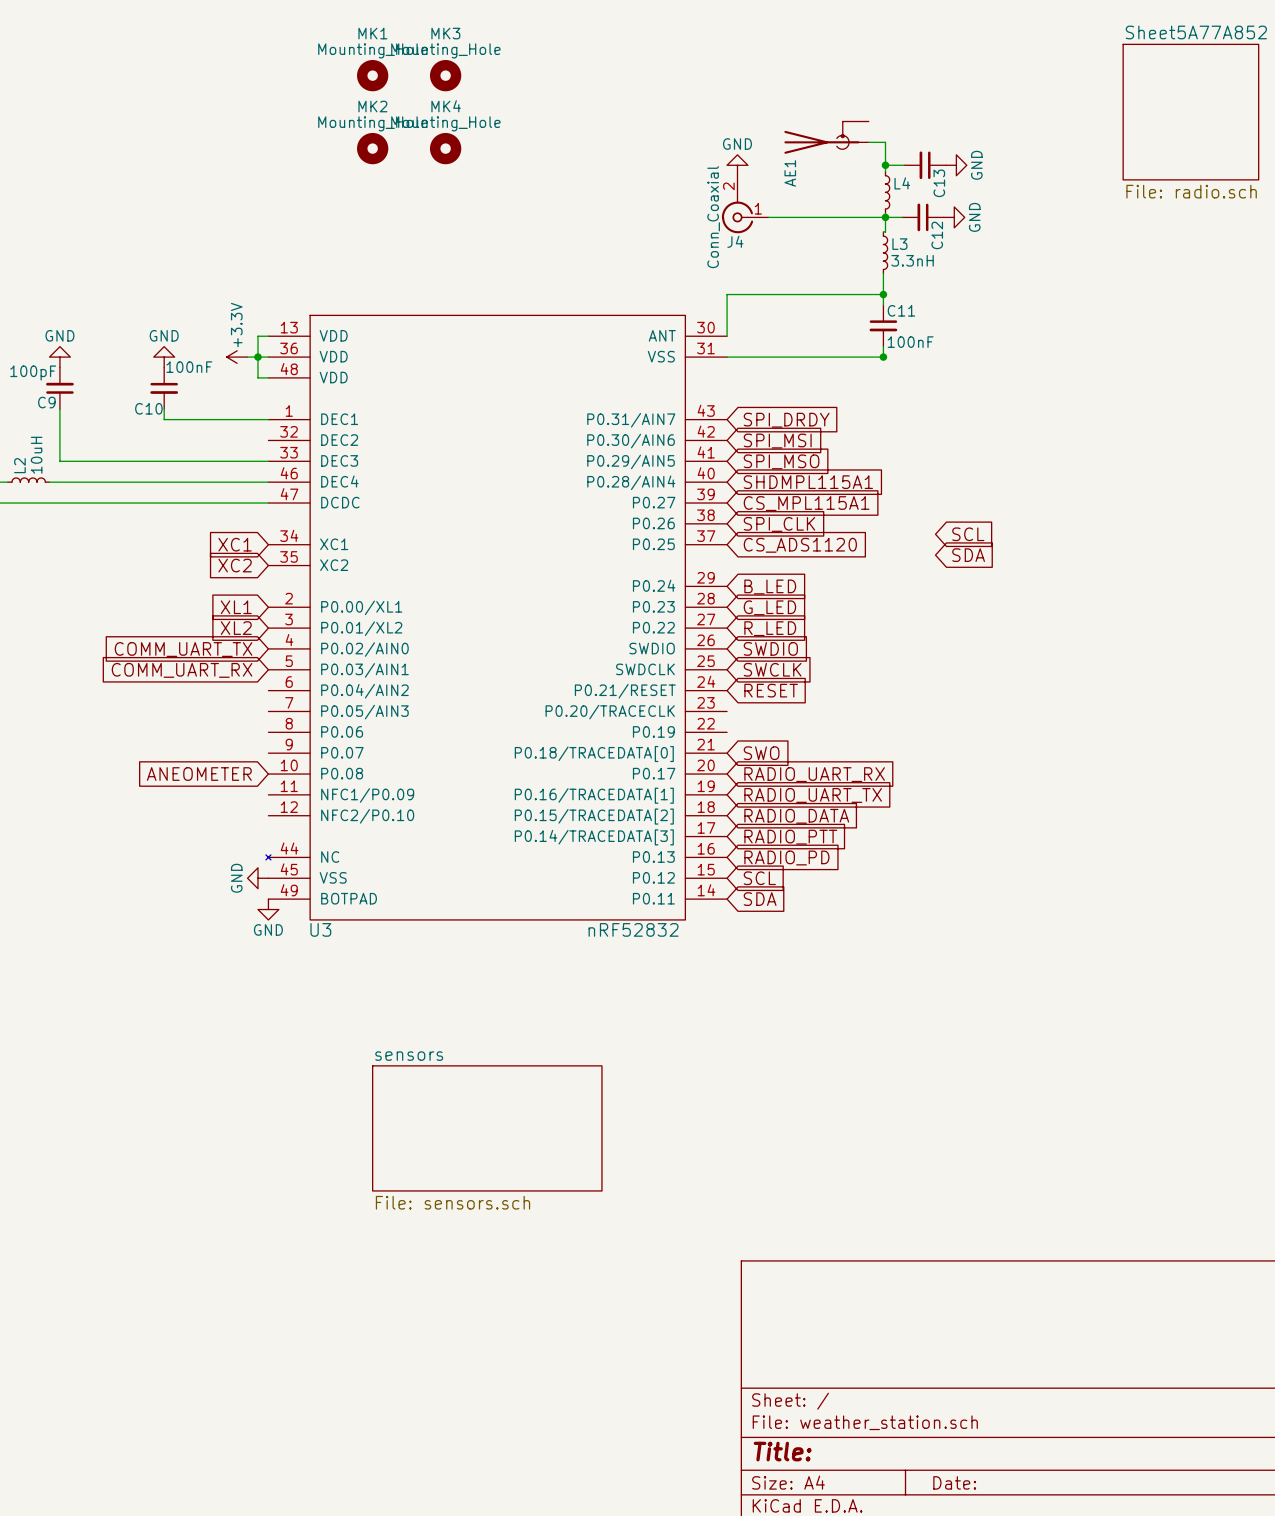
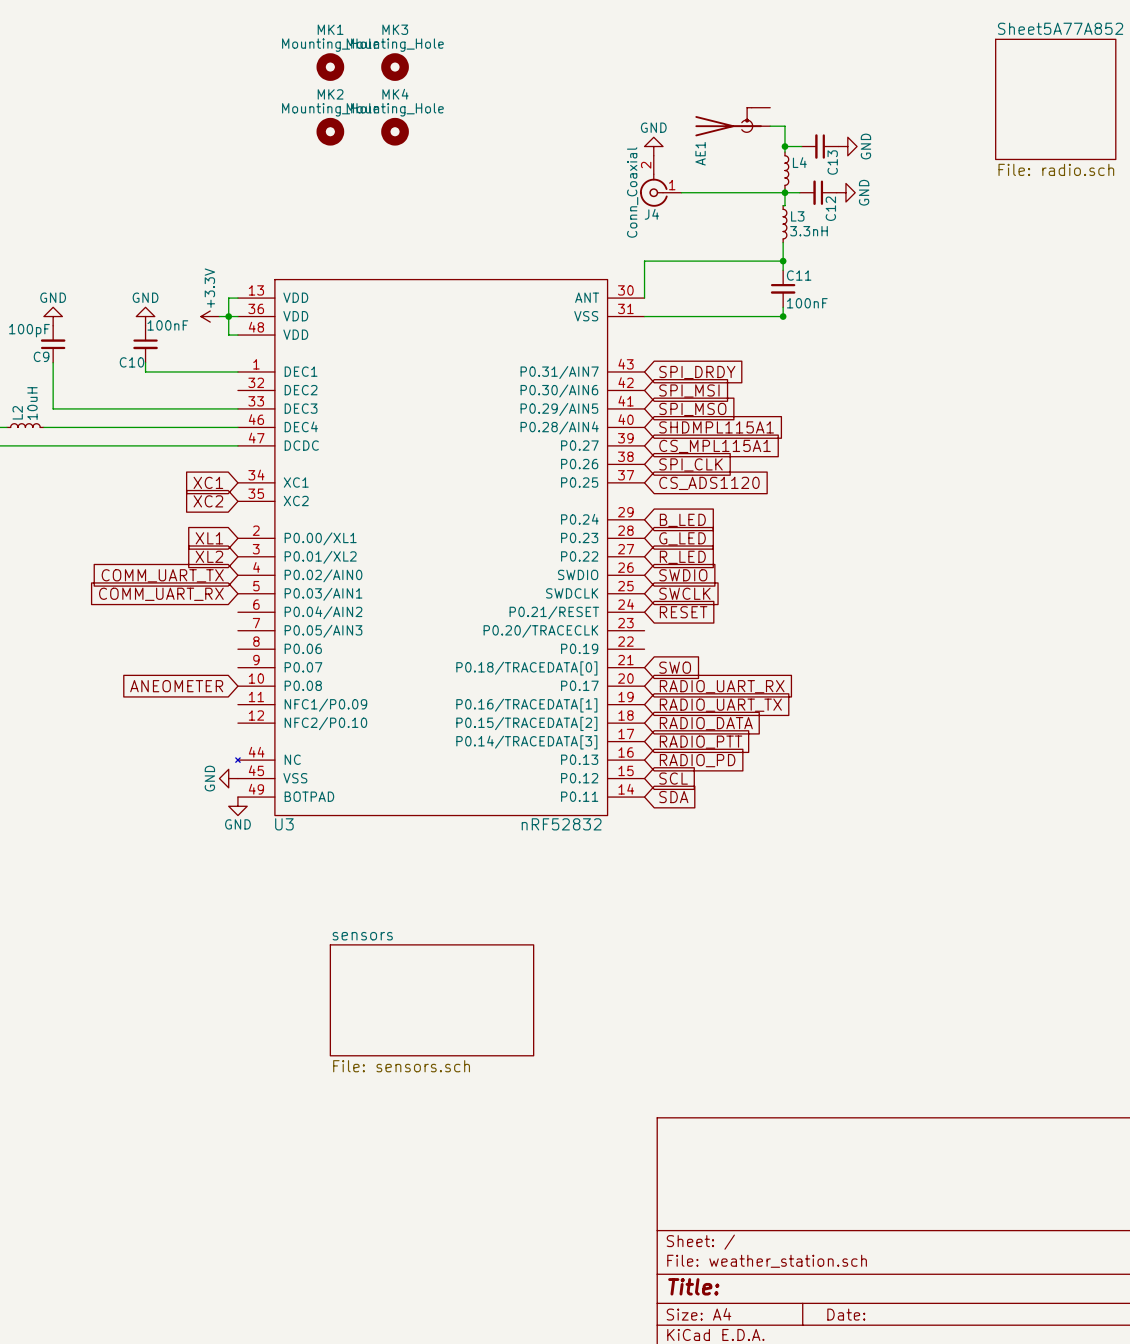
global label: SCL (968, 534) -> none
global label: SDA (968, 555) -> none

